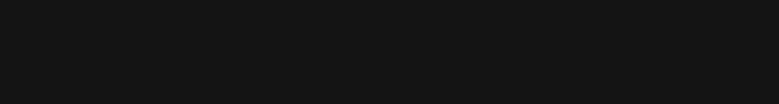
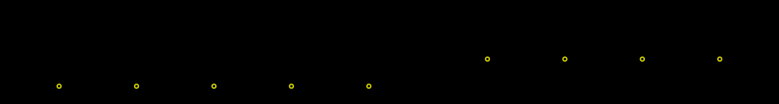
part: none -> (487, 59)
part: none -> (564, 59)
part: none -> (642, 59)
part: none -> (719, 59)
part: none -> (59, 86)
part: none -> (136, 86)
part: none -> (213, 86)
part: none -> (291, 86)
part: none -> (368, 86)

